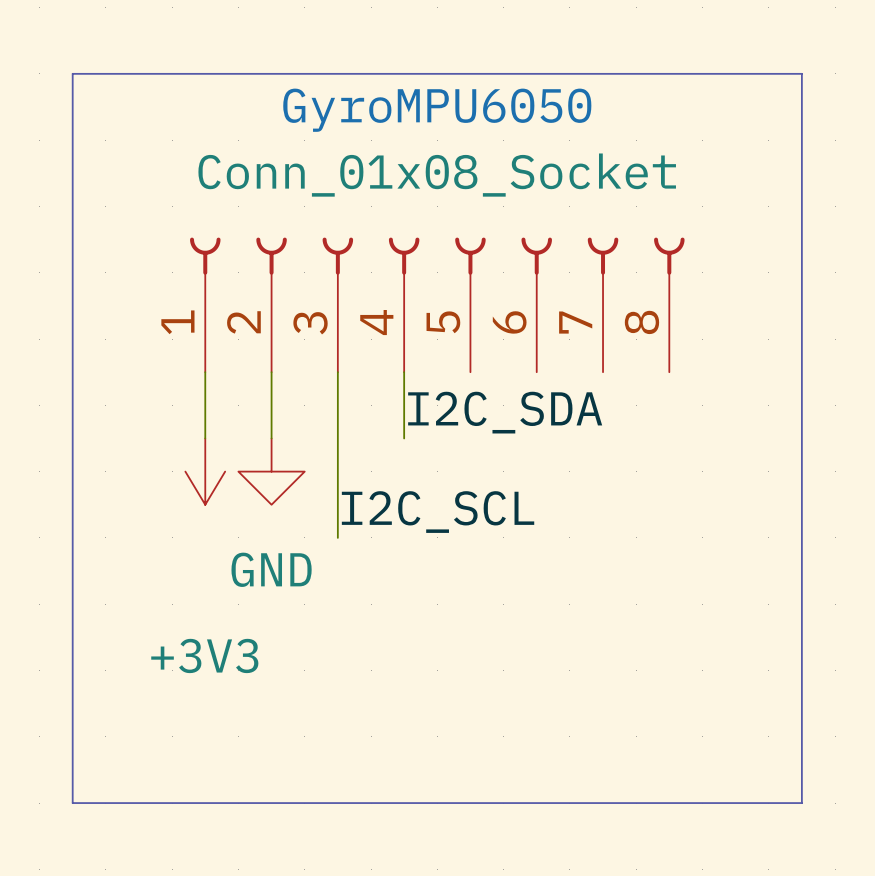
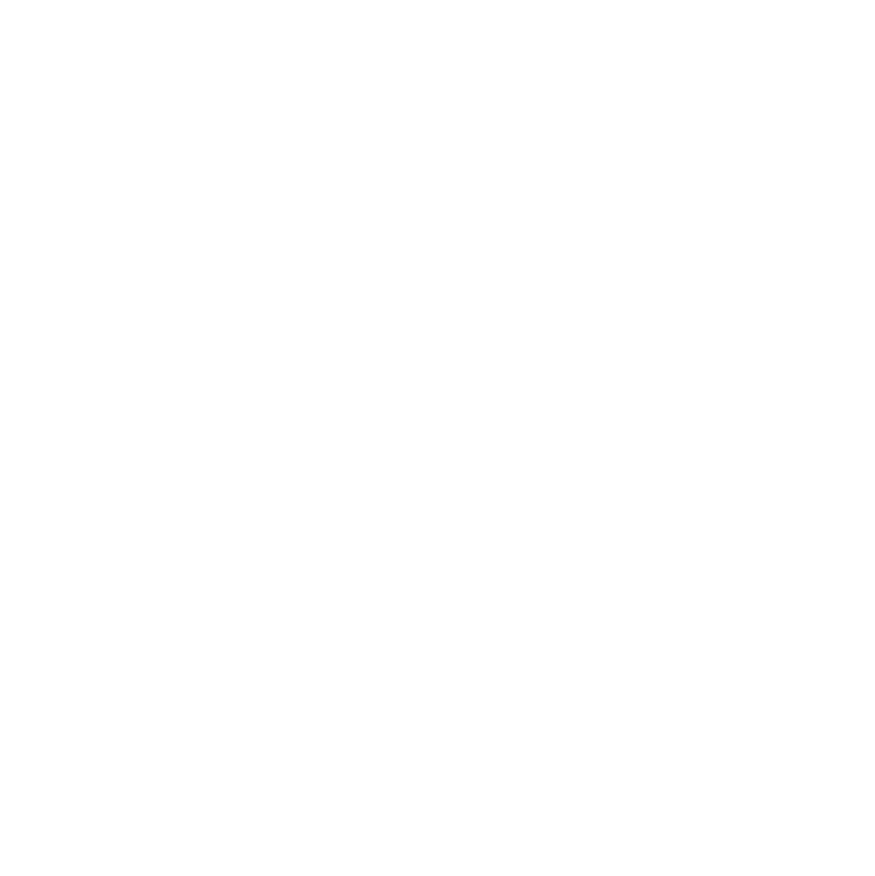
line: (72, 73) (801, 73) (801, 803) (72, 803) (72, 73) -> none
GyroMPU6050: Conn_01x08_Socket (437, 304) -> none
wire: (205, 372) (205, 438) -> none
wire: (271, 372) (271, 438) -> none
wire: (337, 372) (337, 537) -> none
wire: (404, 372) (404, 438) -> none
label: I2C_SDA (505, 412) -> none
power symbol: +3V3 (205, 471) -> none
power symbol: GND (271, 471) -> none
label: I2C_SCL (438, 512) -> none

